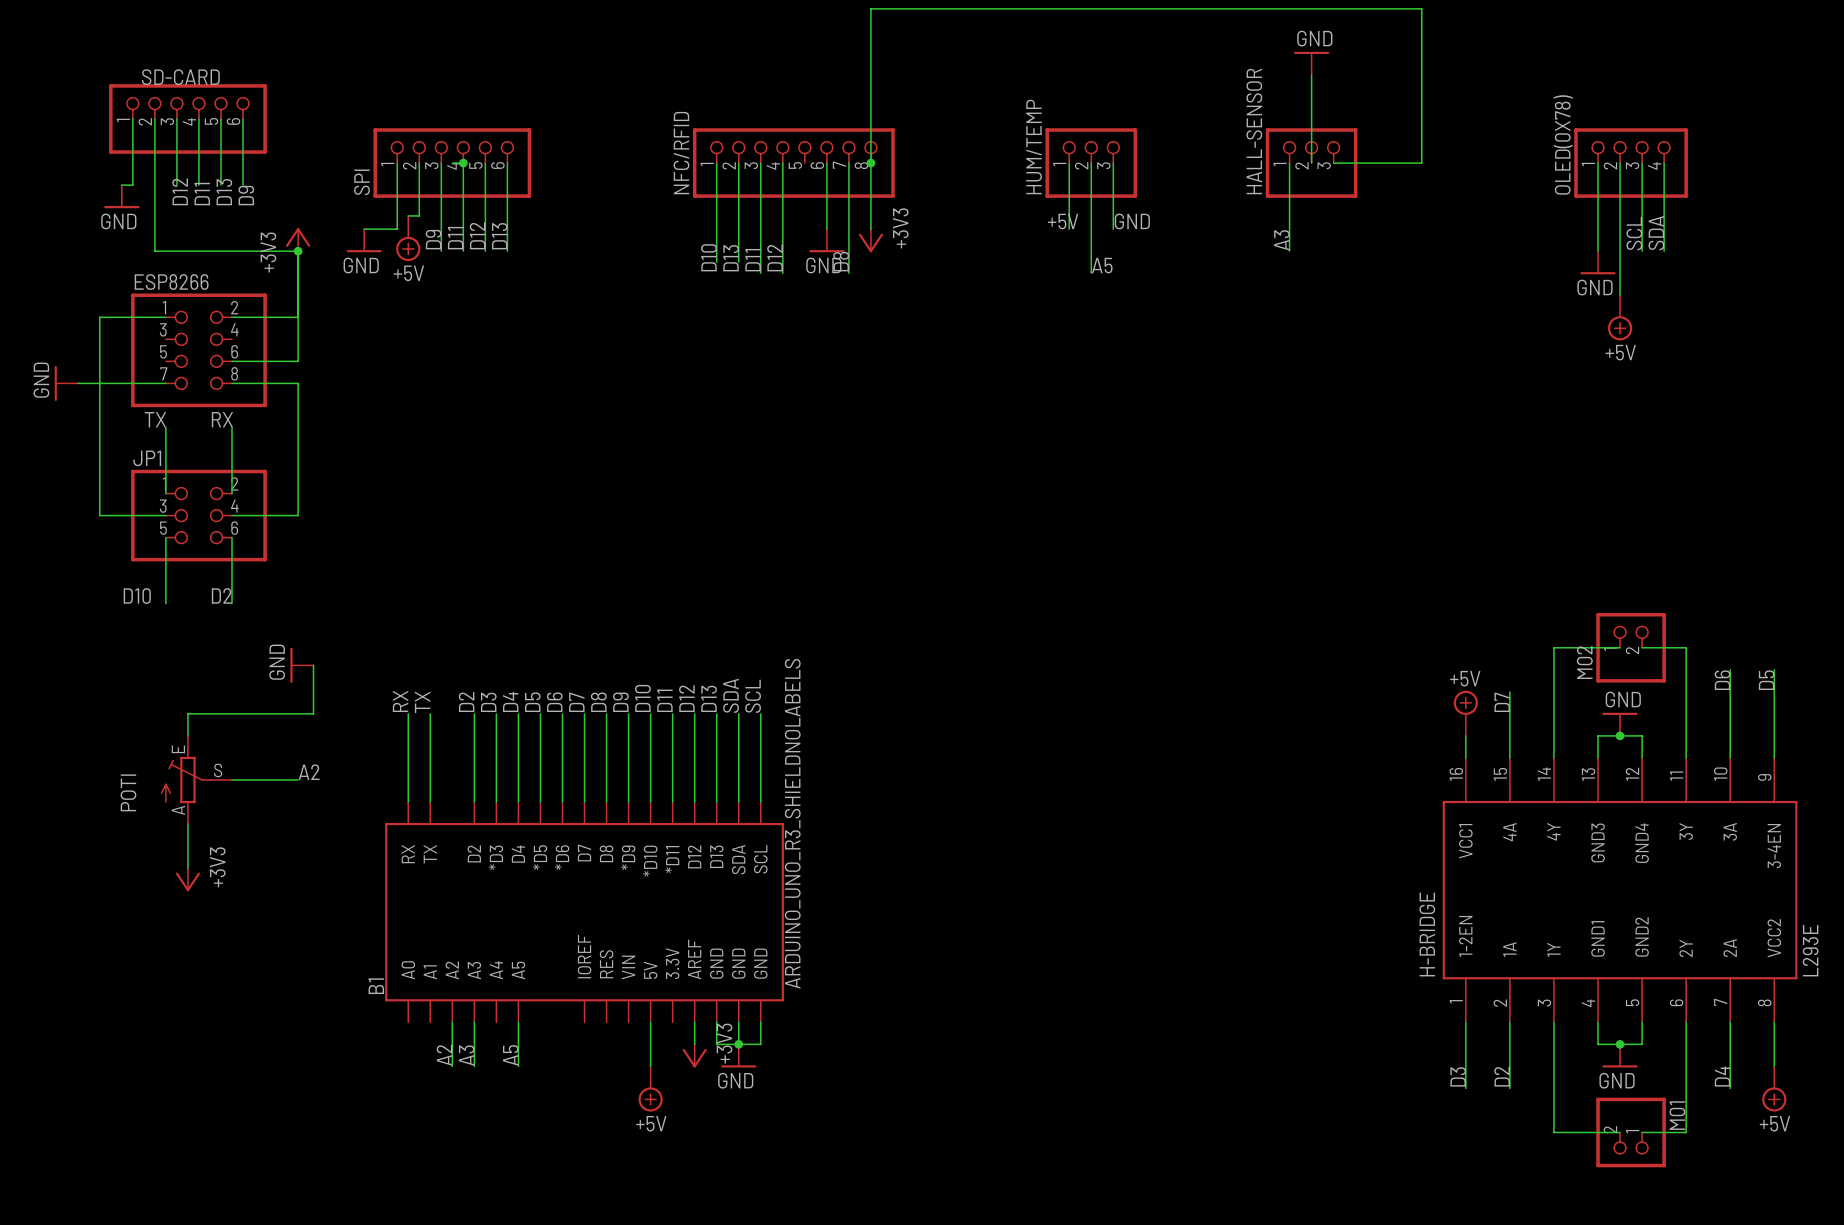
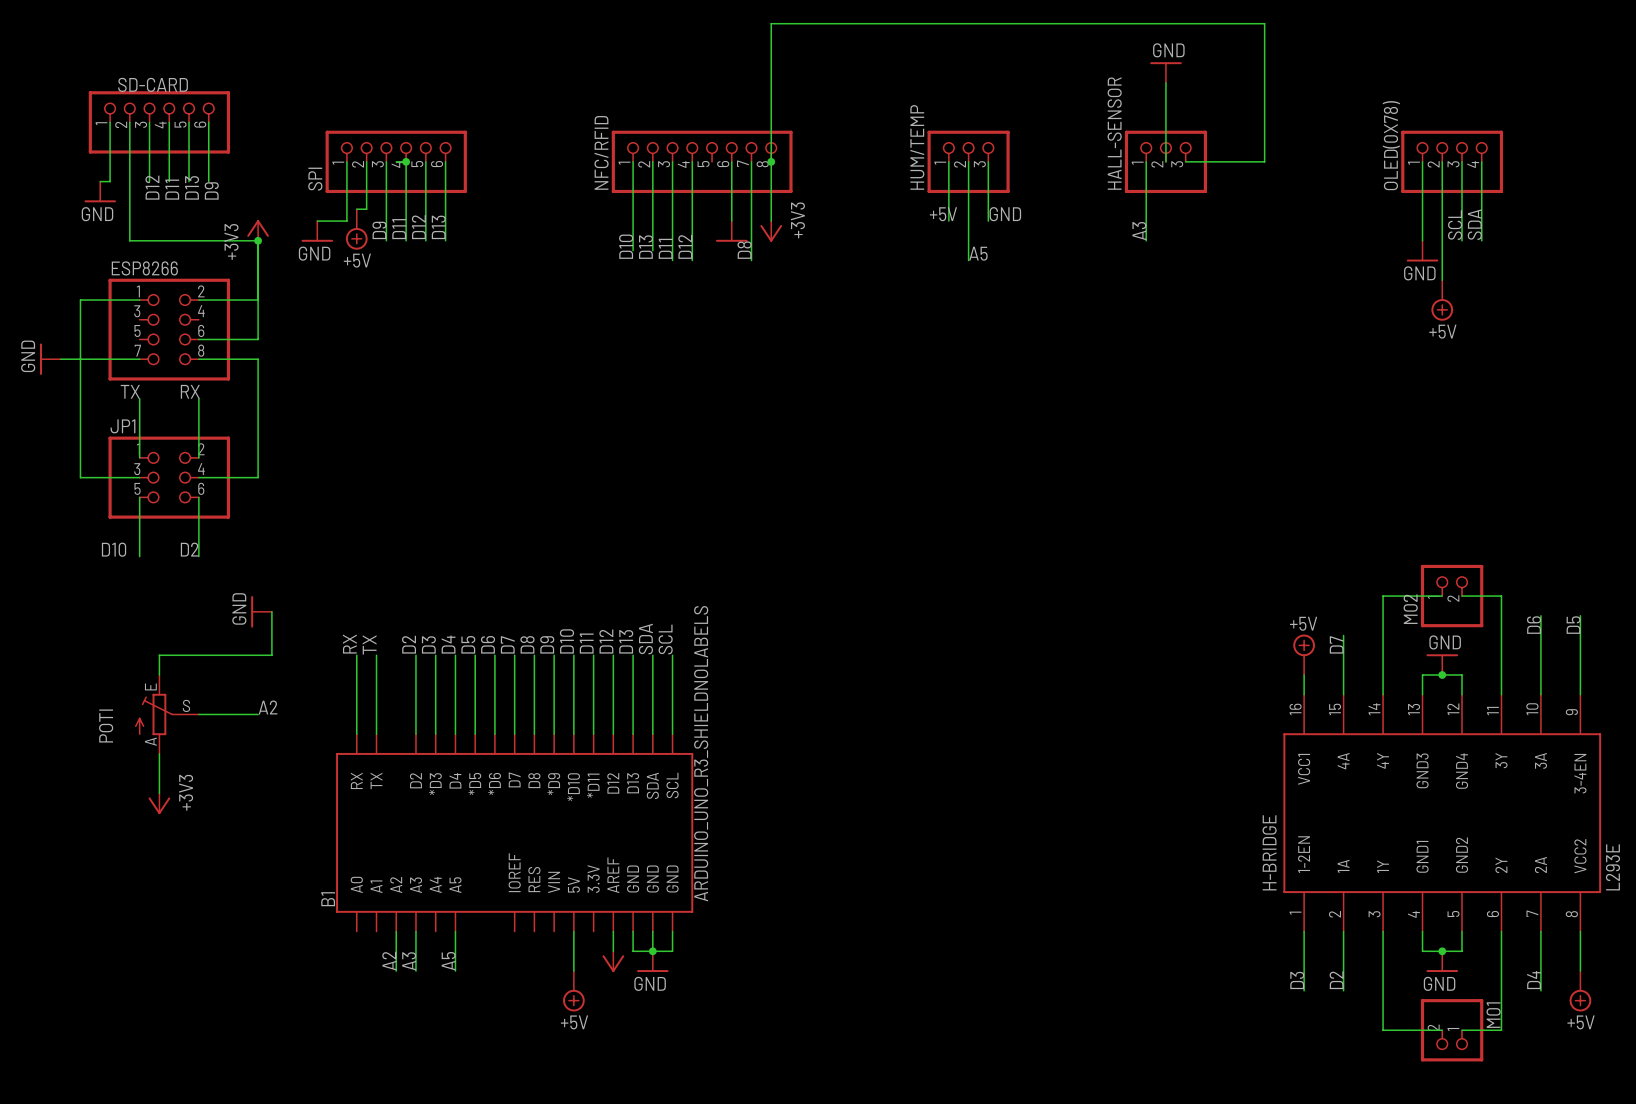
power symbol text: GND (823, 265) -> none
power symbol text: +3V3 (724, 1043) -> none

